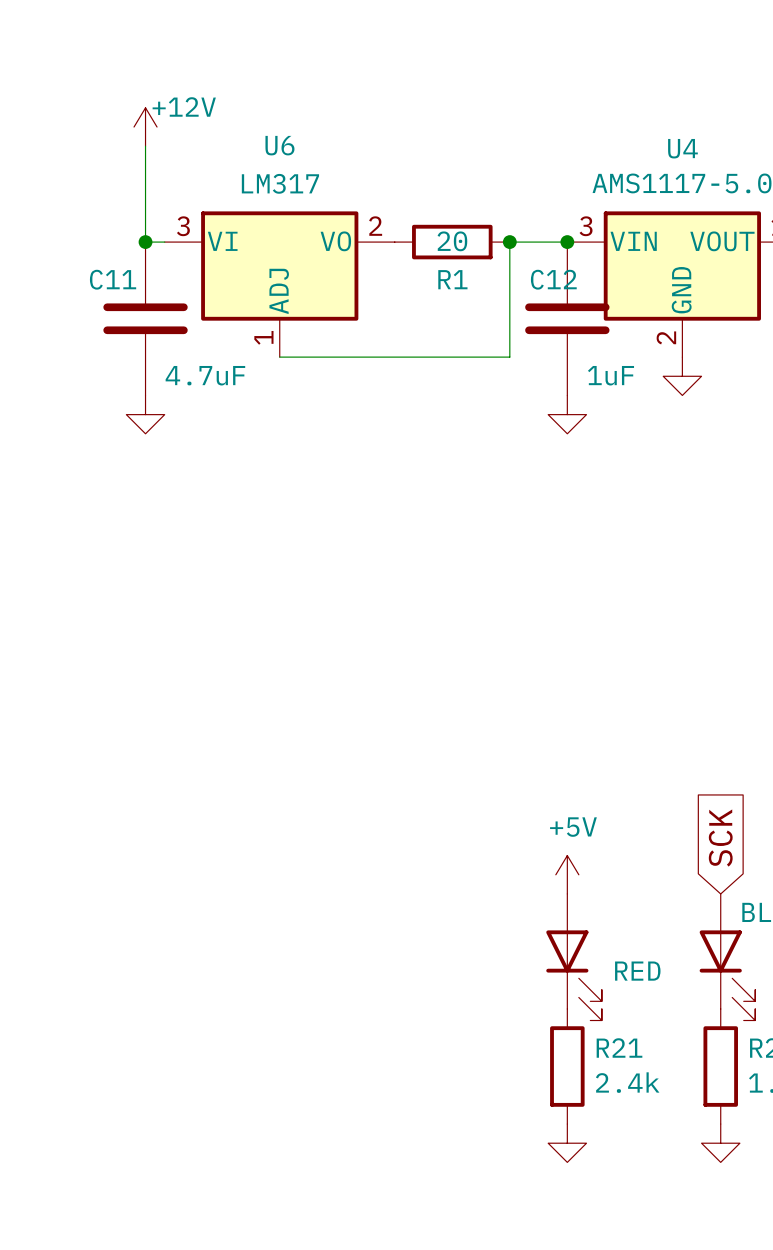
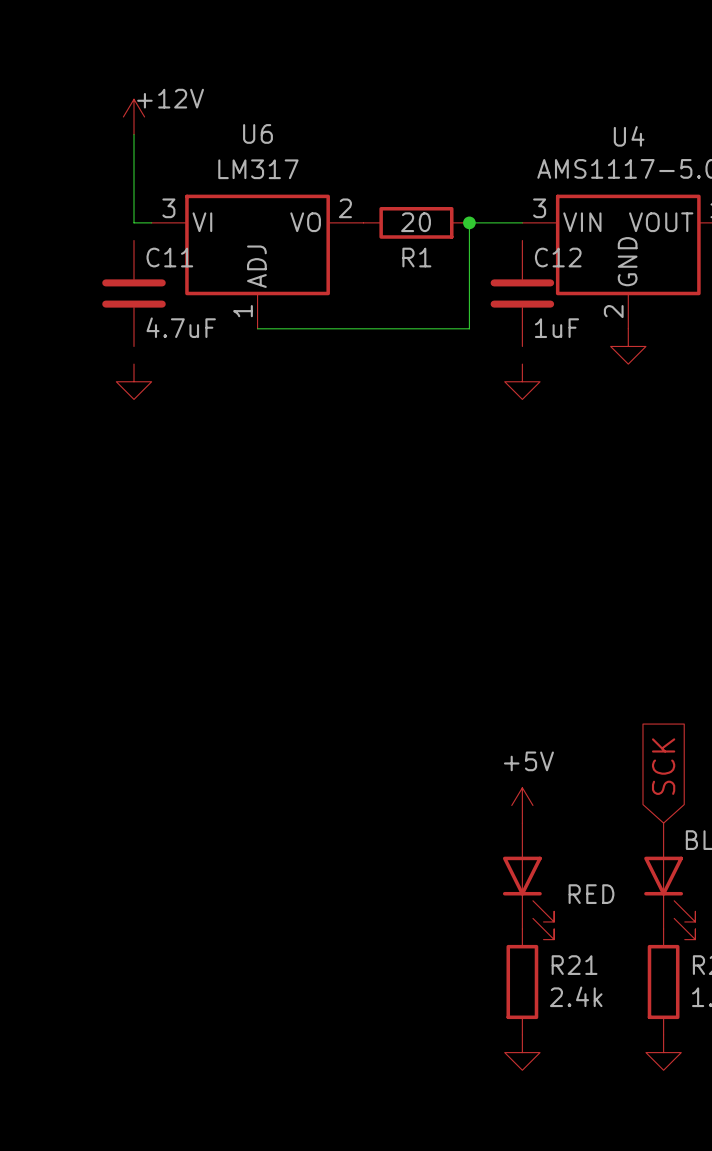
C11 symbol: [103, 242, 188, 396] -> [102, 240, 166, 347]
junction: (145, 242) -> none
C12 symbol: [525, 242, 610, 396] -> [490, 240, 555, 347]
junction: (567, 242) -> none
C11 name position: C11 (113, 279) -> C11 (169, 257)
C12 name position: C12 (553, 279) -> C12 (558, 257)

